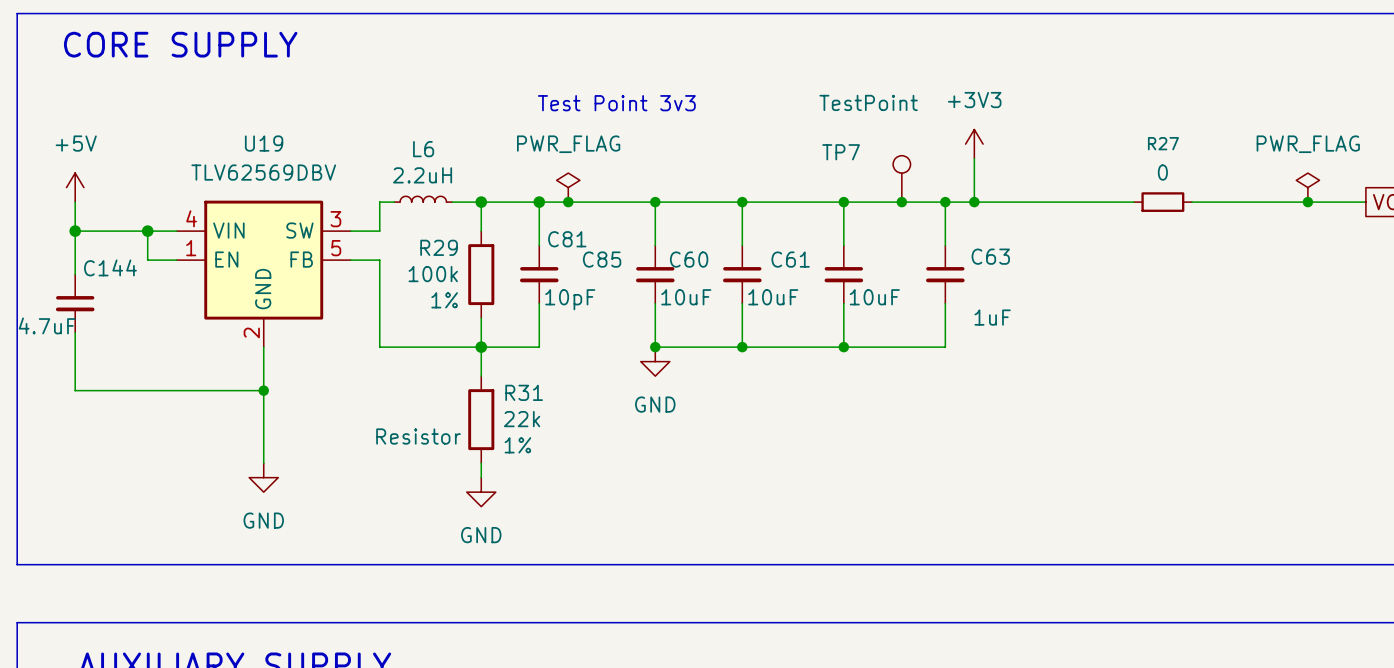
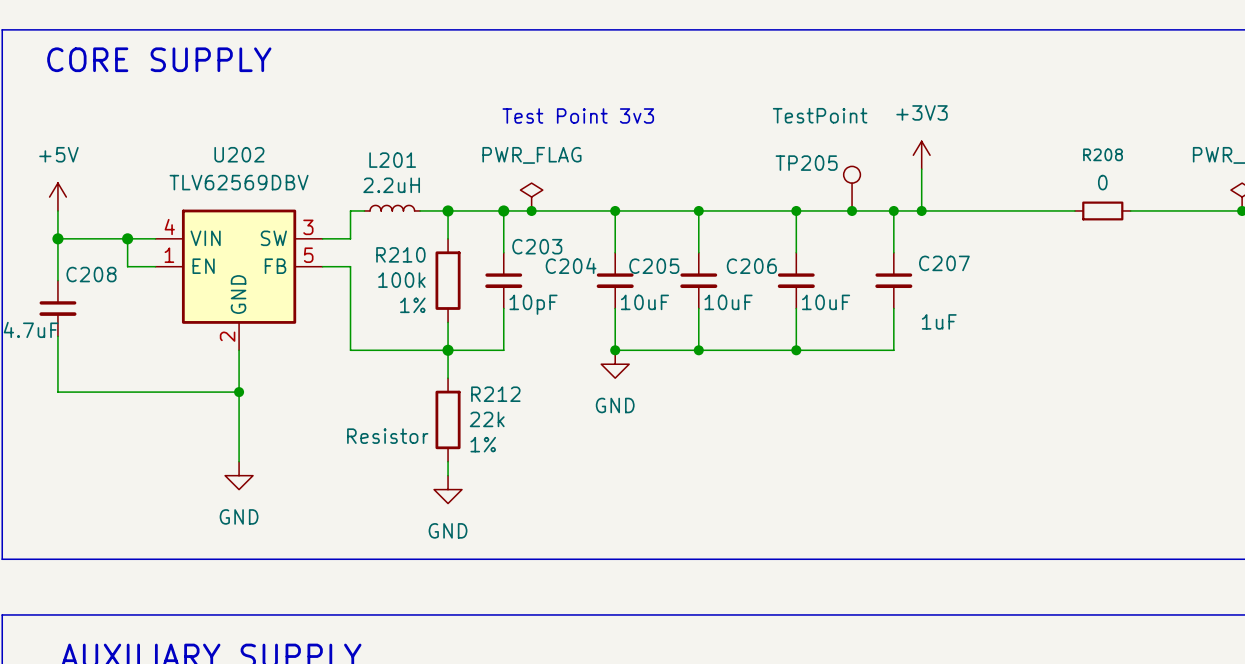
U19 name: U19 (264, 143) -> U202 (239, 154)
R27 name: R27 (1163, 143) -> R208 (1103, 154)
L6 name: L6 (423, 149) -> L201 (392, 160)
TP7 name: TP7 (841, 152) -> TP205 (806, 163)
C81 name: C81 (567, 239) -> C203 (537, 246)
R29 name: R29 (439, 247) -> R210 (400, 254)
C63 name: C63 (990, 256) -> C207 (944, 263)
C85 name: C85 (602, 259) -> C204 (571, 265)
C60 name: C60 (689, 259) -> C205 (654, 266)
C61 name: C61 (790, 259) -> C206 (751, 266)
C144 name: C144 (110, 267) -> C208 (91, 274)
R31 name: R31 (524, 392) -> R212 (495, 394)

